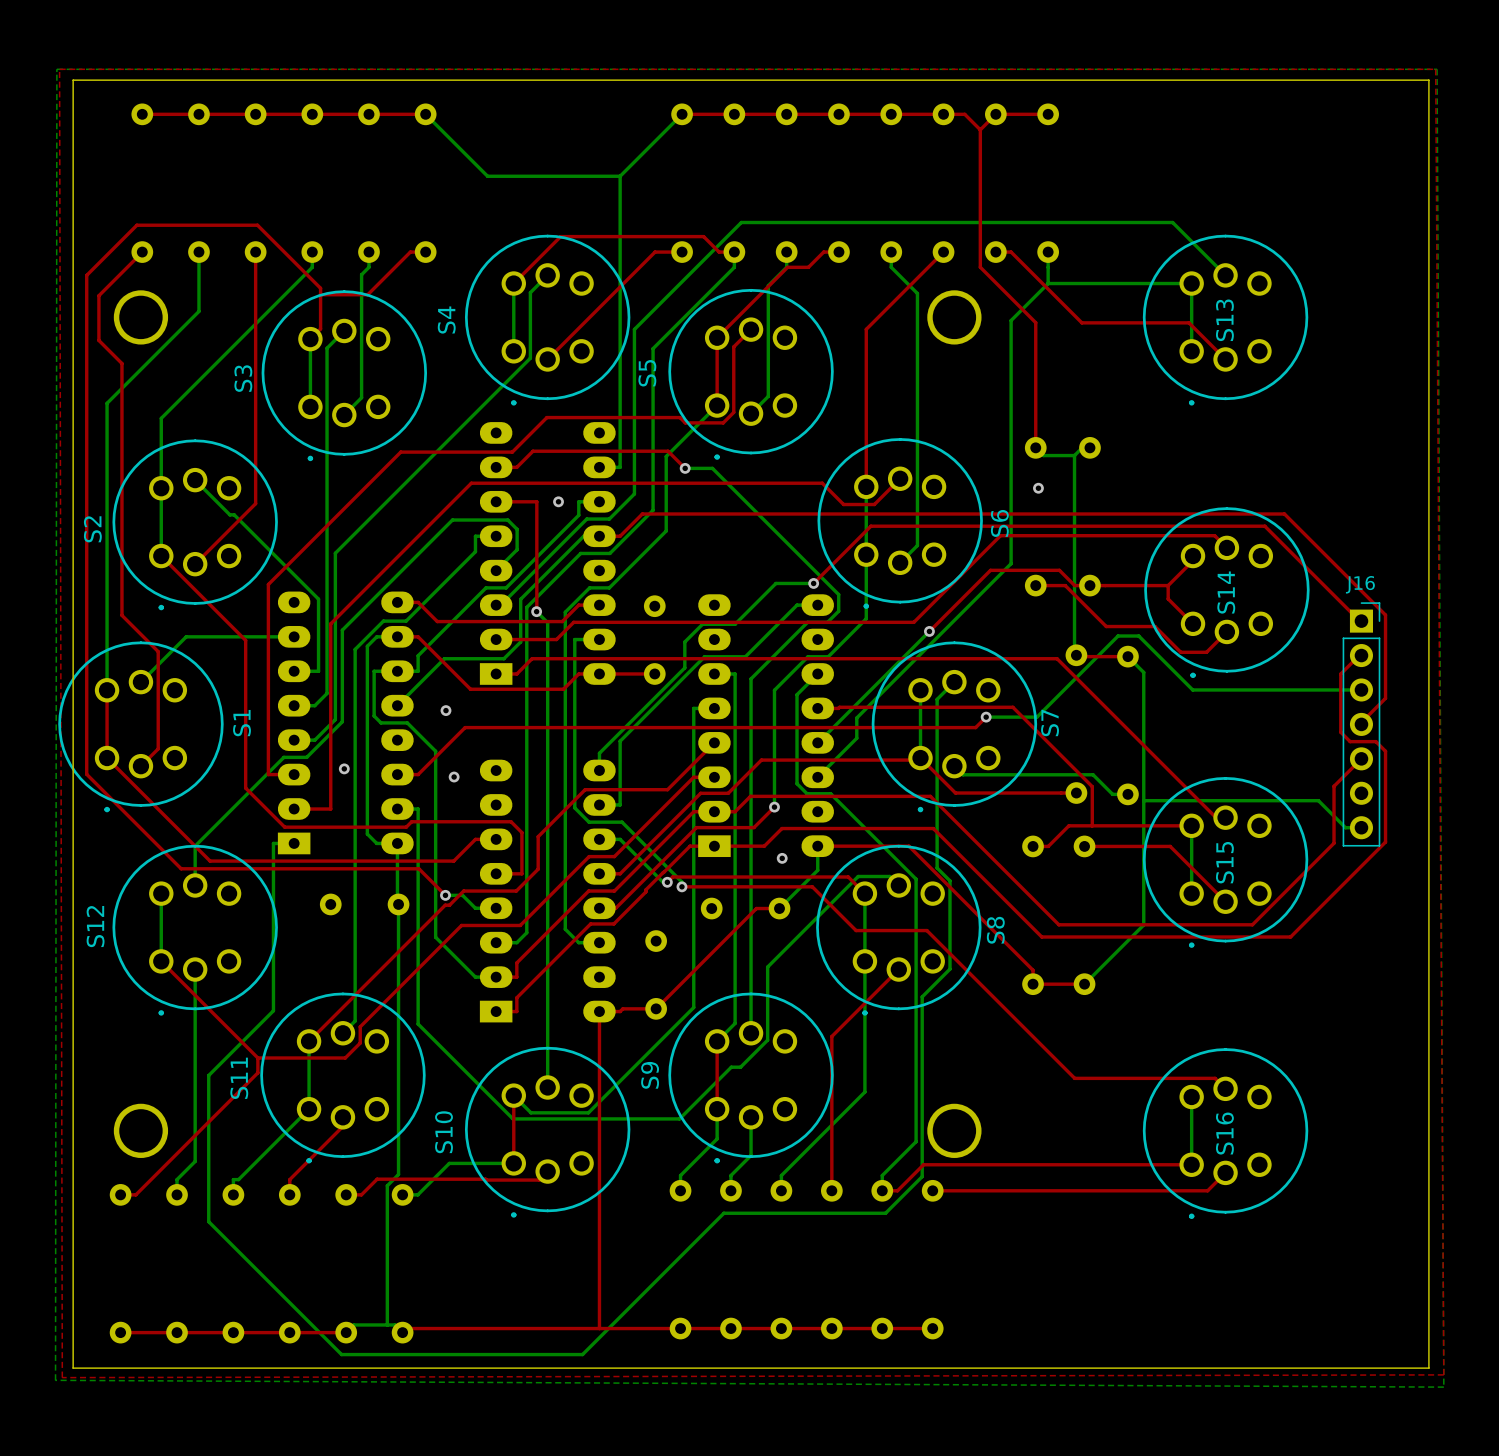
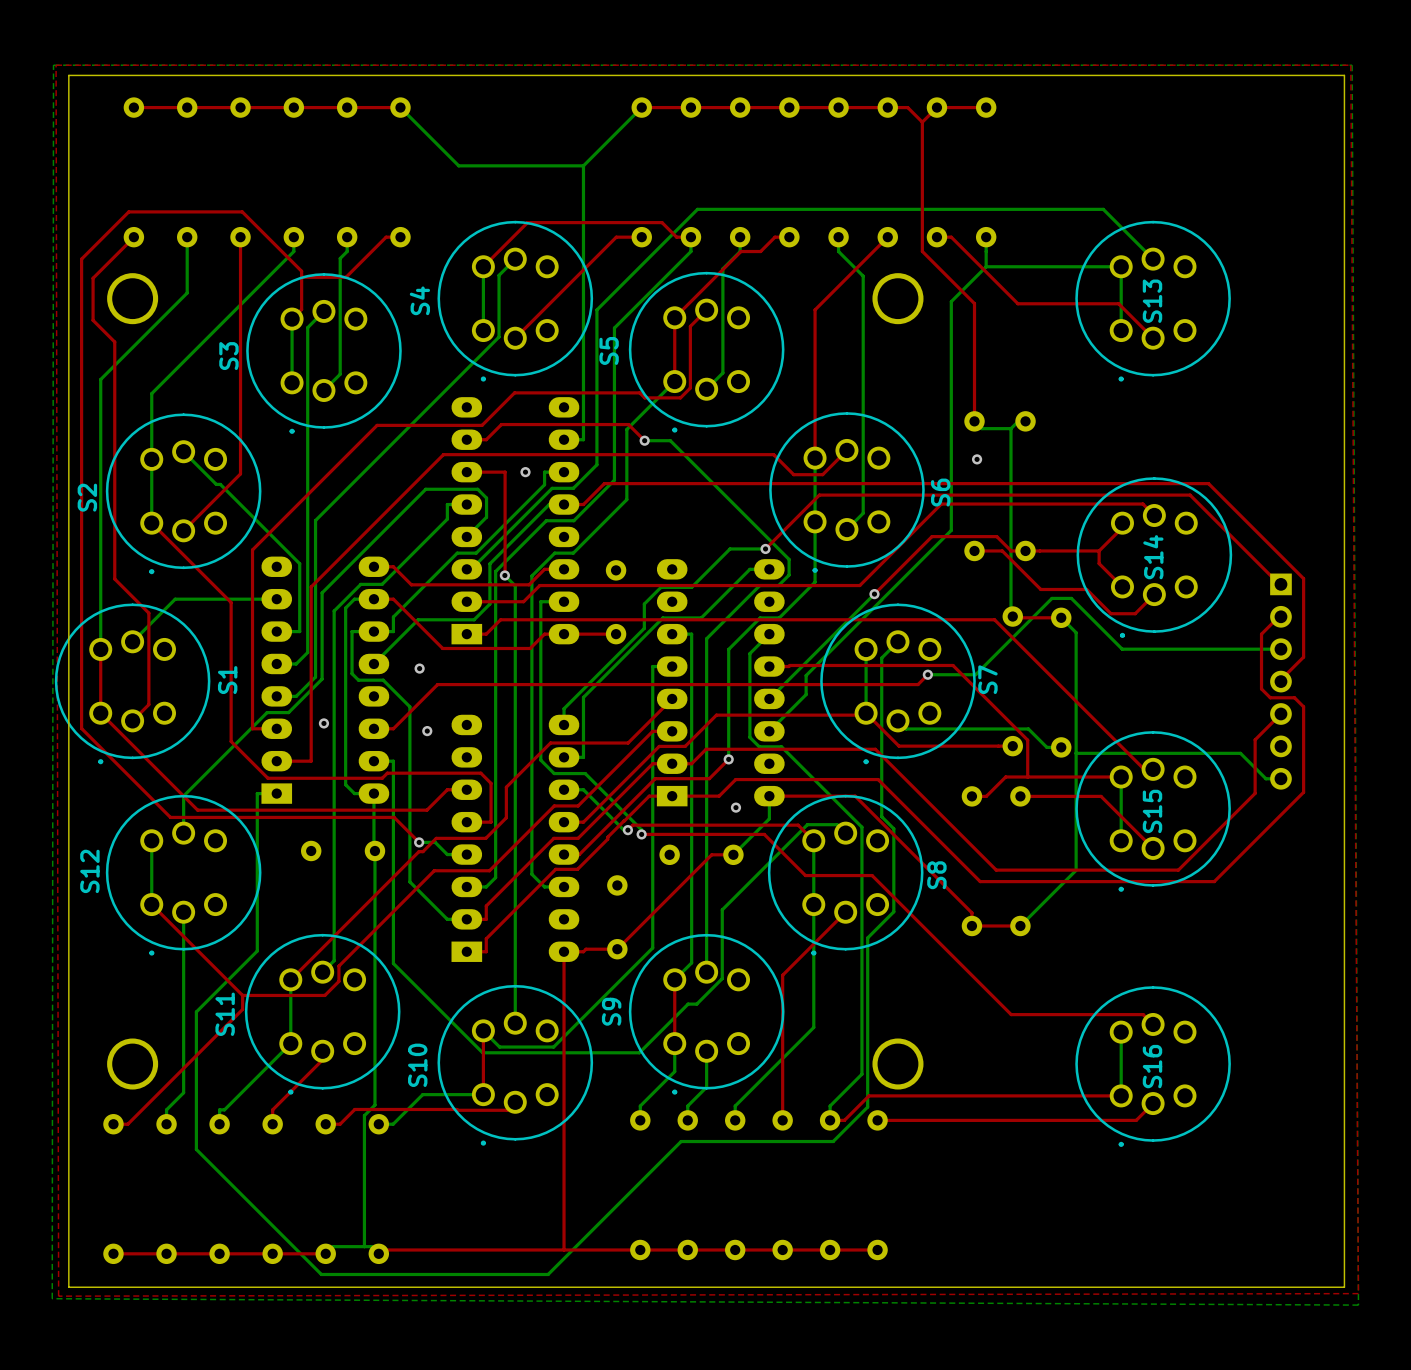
J16 side: top (1361, 724) -> bottom (1280, 681)

